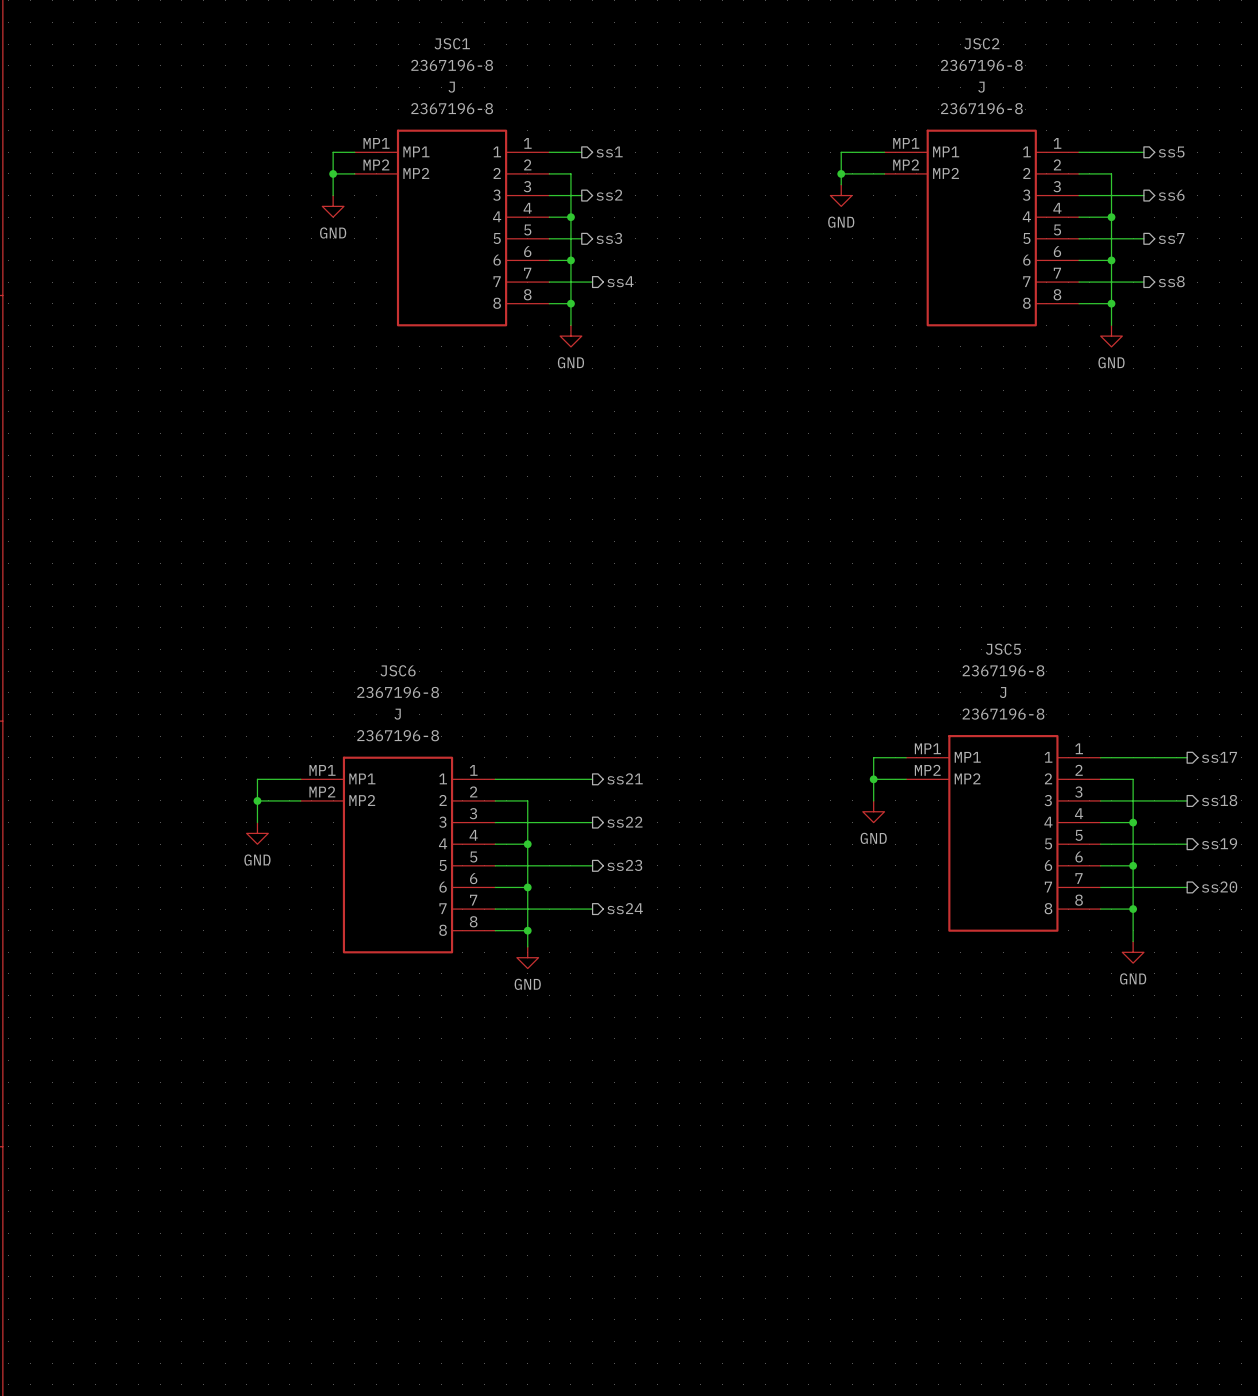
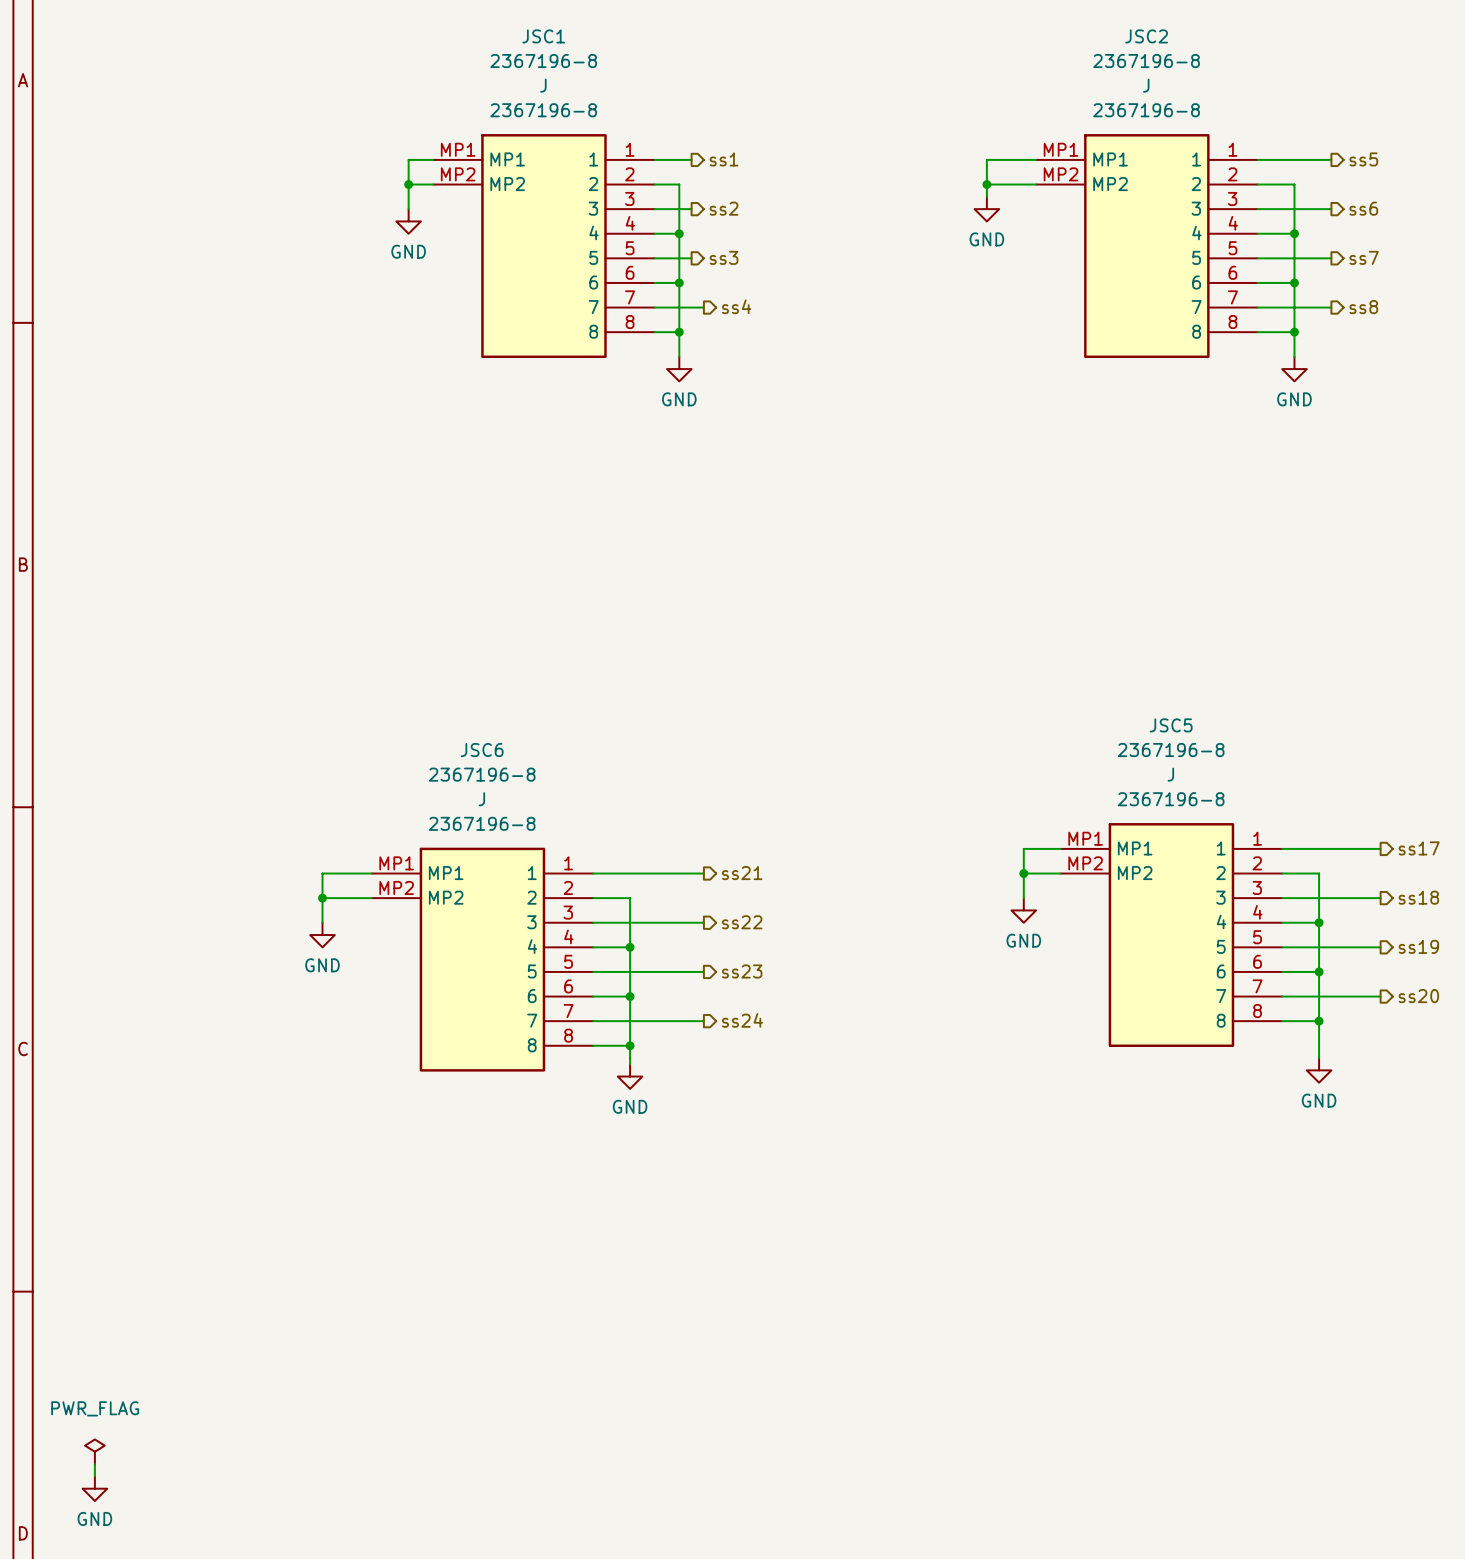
power symbol: none -> PWR_FLAG (94, 1451)
wire: none -> (94, 1464) (94, 1476)
power symbol: none -> GND (94, 1488)

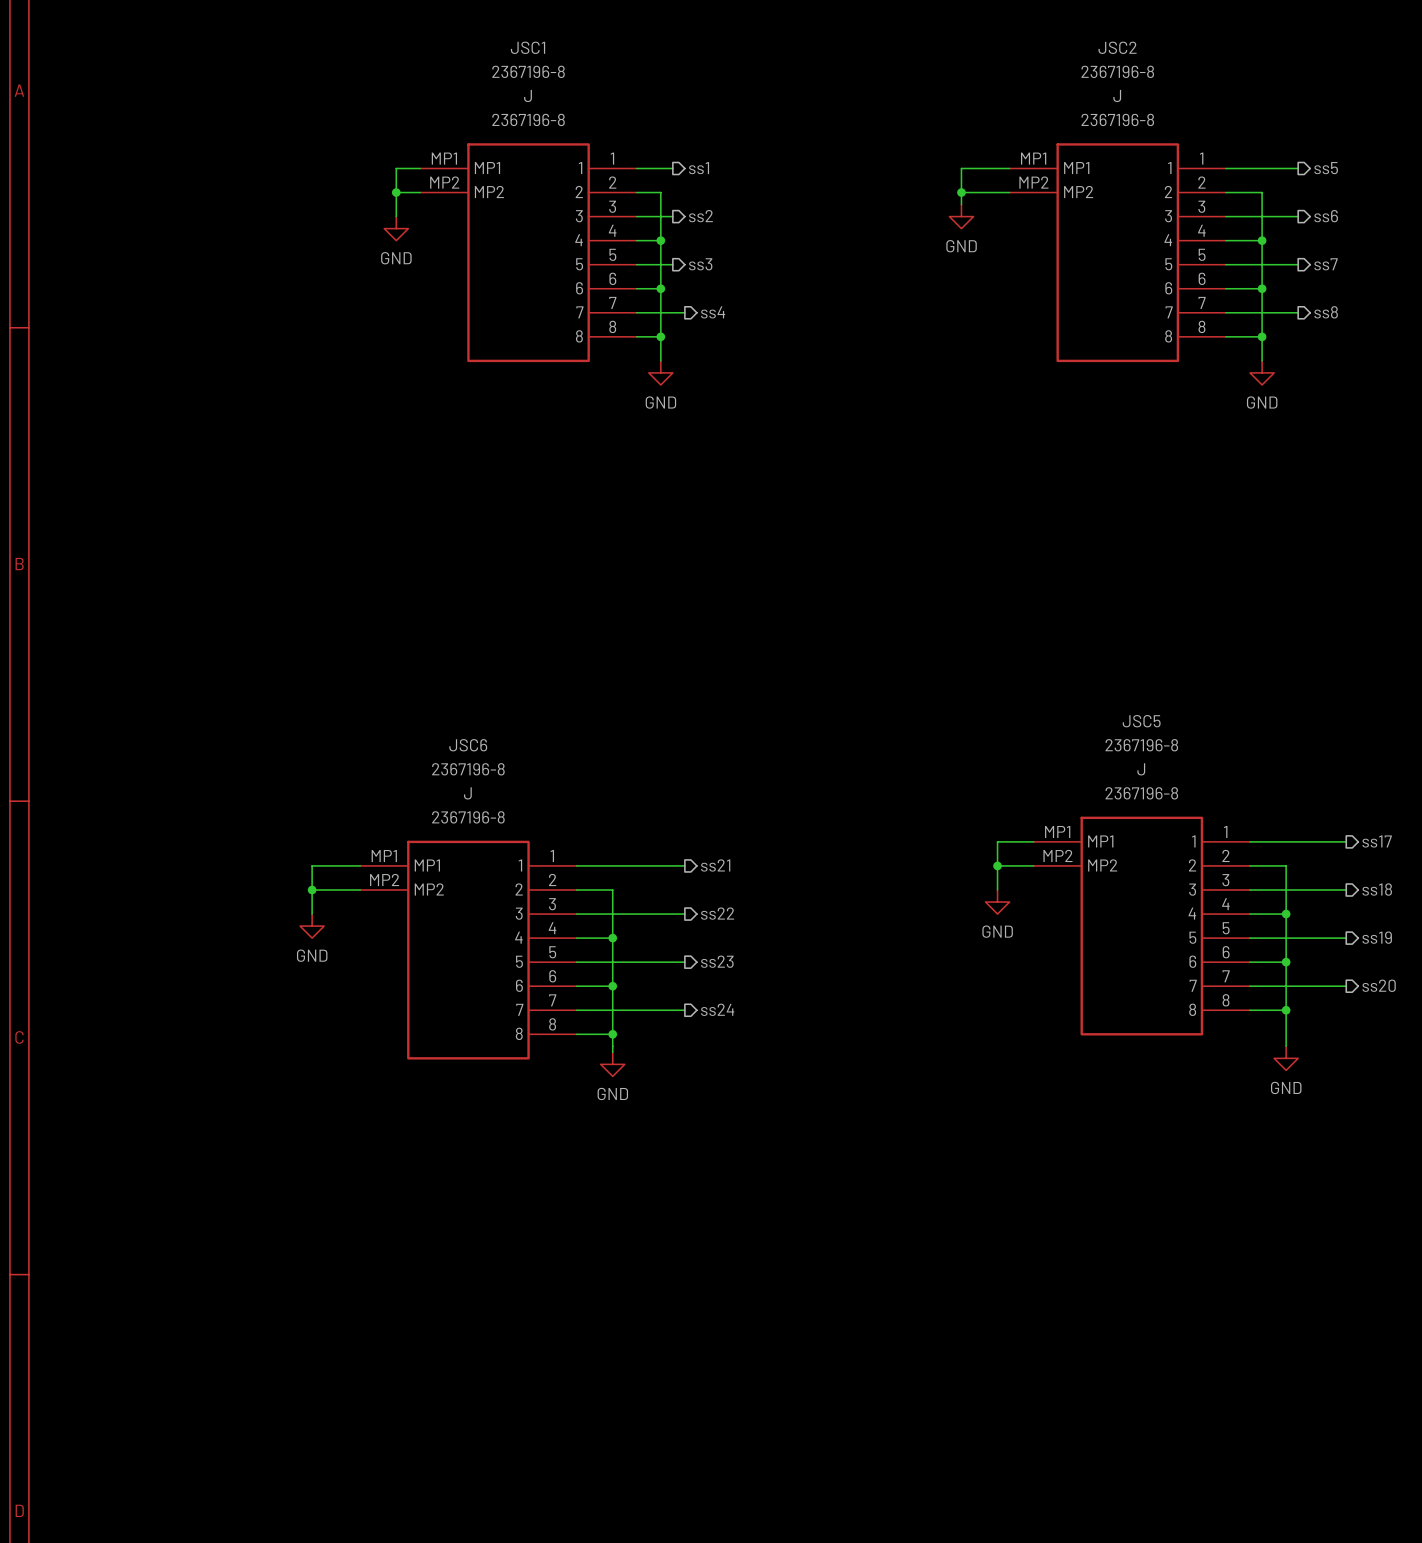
power symbol: PWR_FLAG (94, 1451) -> none
wire: (94, 1464) (94, 1476) -> none
power symbol: GND (94, 1488) -> none

